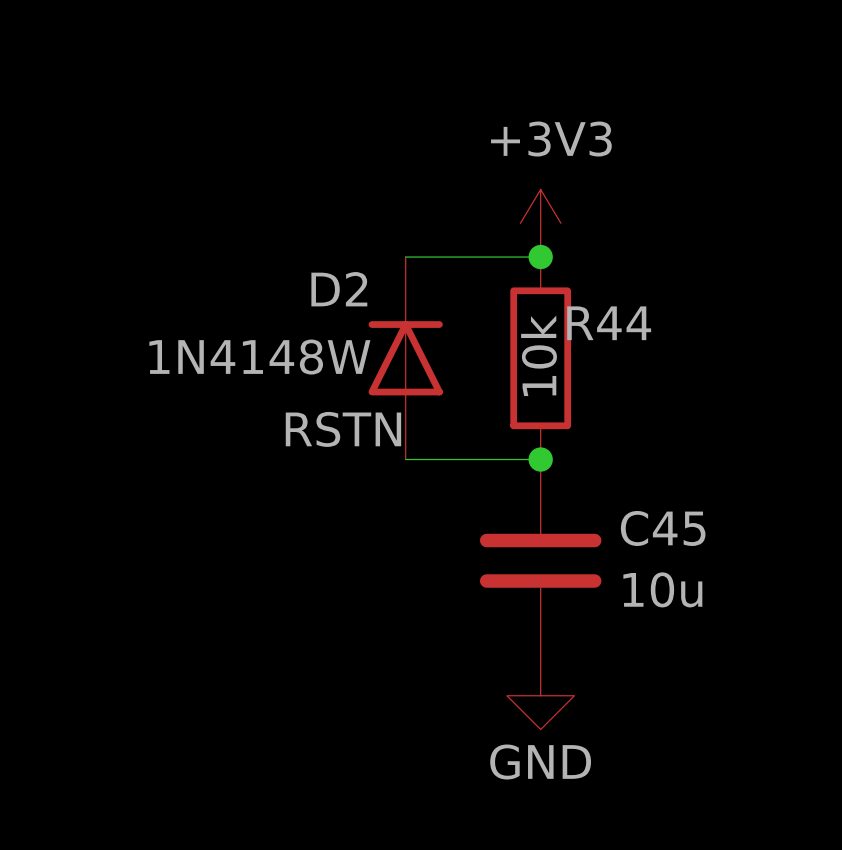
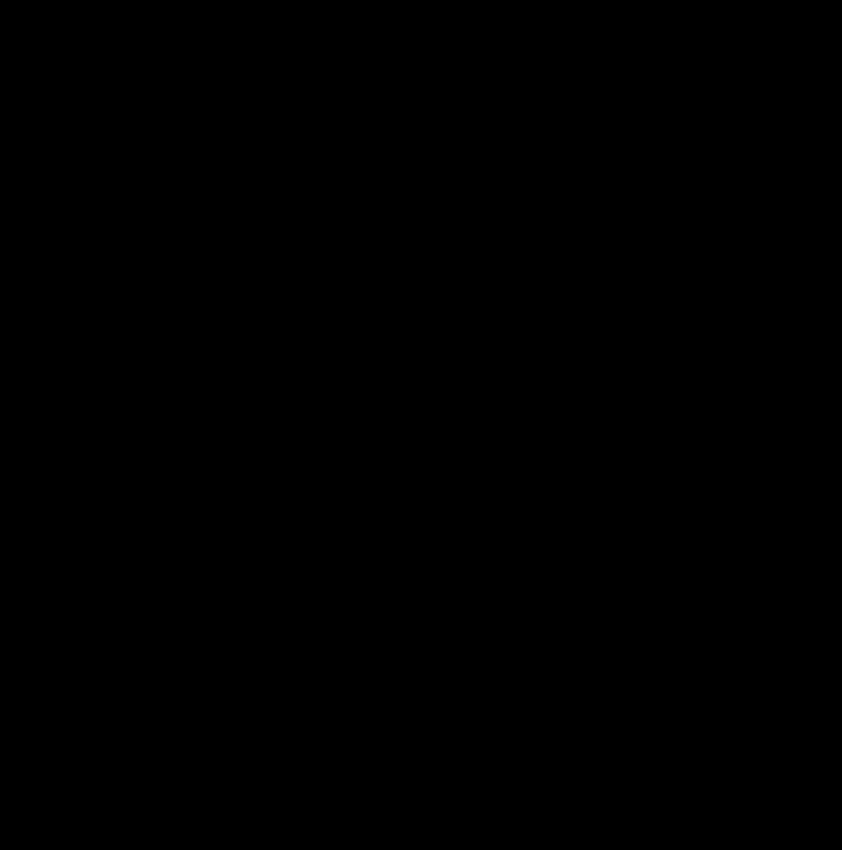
power symbol: +3V3 (540, 223) -> none
wire: (405, 257) (540, 257) -> none
junction: (540, 257) -> none
D2: 1N4148W (405, 358) -> none
R44: 10k (540, 358) -> none
label: RSTN (343, 429) -> none
wire: (405, 459) (540, 459) -> none
junction: (540, 459) -> none
C45: 10u (540, 560) -> none
power symbol: GND (540, 695) -> none

